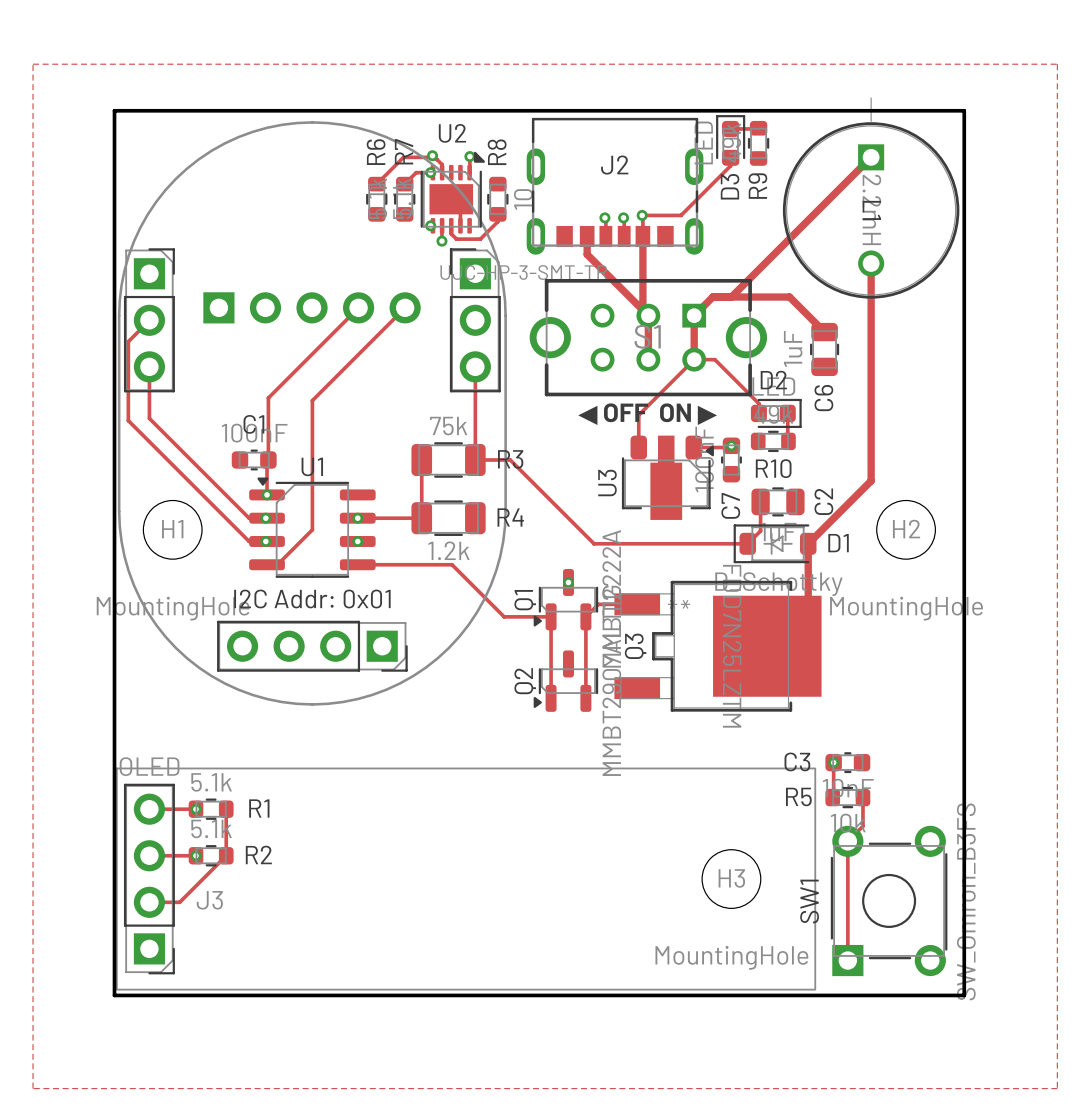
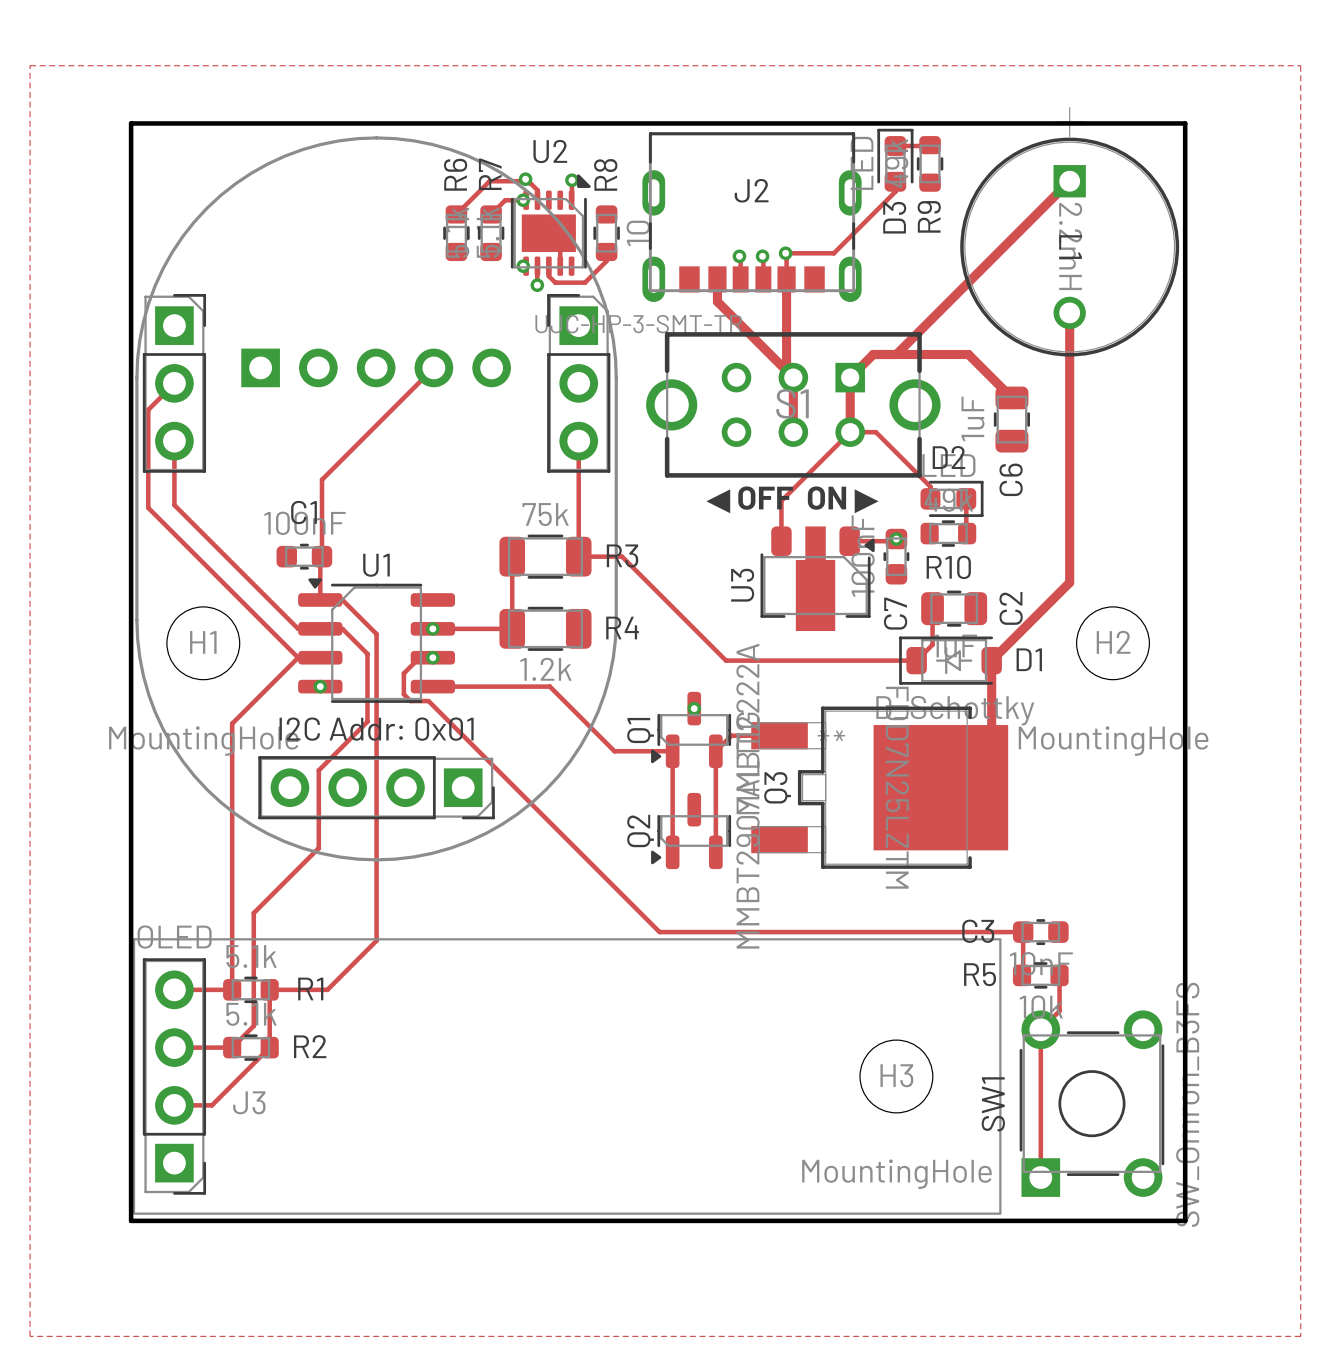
track: (405, 307) (312, 400) (312, 522) -> (320, 599) (342, 599) (376, 634)
via: (267, 494) -> none
via: (265, 518) -> none
track: none -> (320, 628) (342, 628) (367, 653) (367, 721) (318, 770) (318, 848) (253, 913) (253, 1026) (232, 1047)
track: (312, 529) (277, 564) (267, 564) -> (376, 643) (376, 940) (327, 989) (269, 989)
track: none -> (298, 657) (232, 723) (232, 989)
via: (265, 541) -> none
track: none -> (432, 657) (419, 657) (403, 673) (403, 694) (410, 701) (428, 701) (659, 932) (1023, 932)
via: none -> (320, 686)
via: (833, 762) -> none
via: (195, 809) -> none
via: (195, 855) -> none

